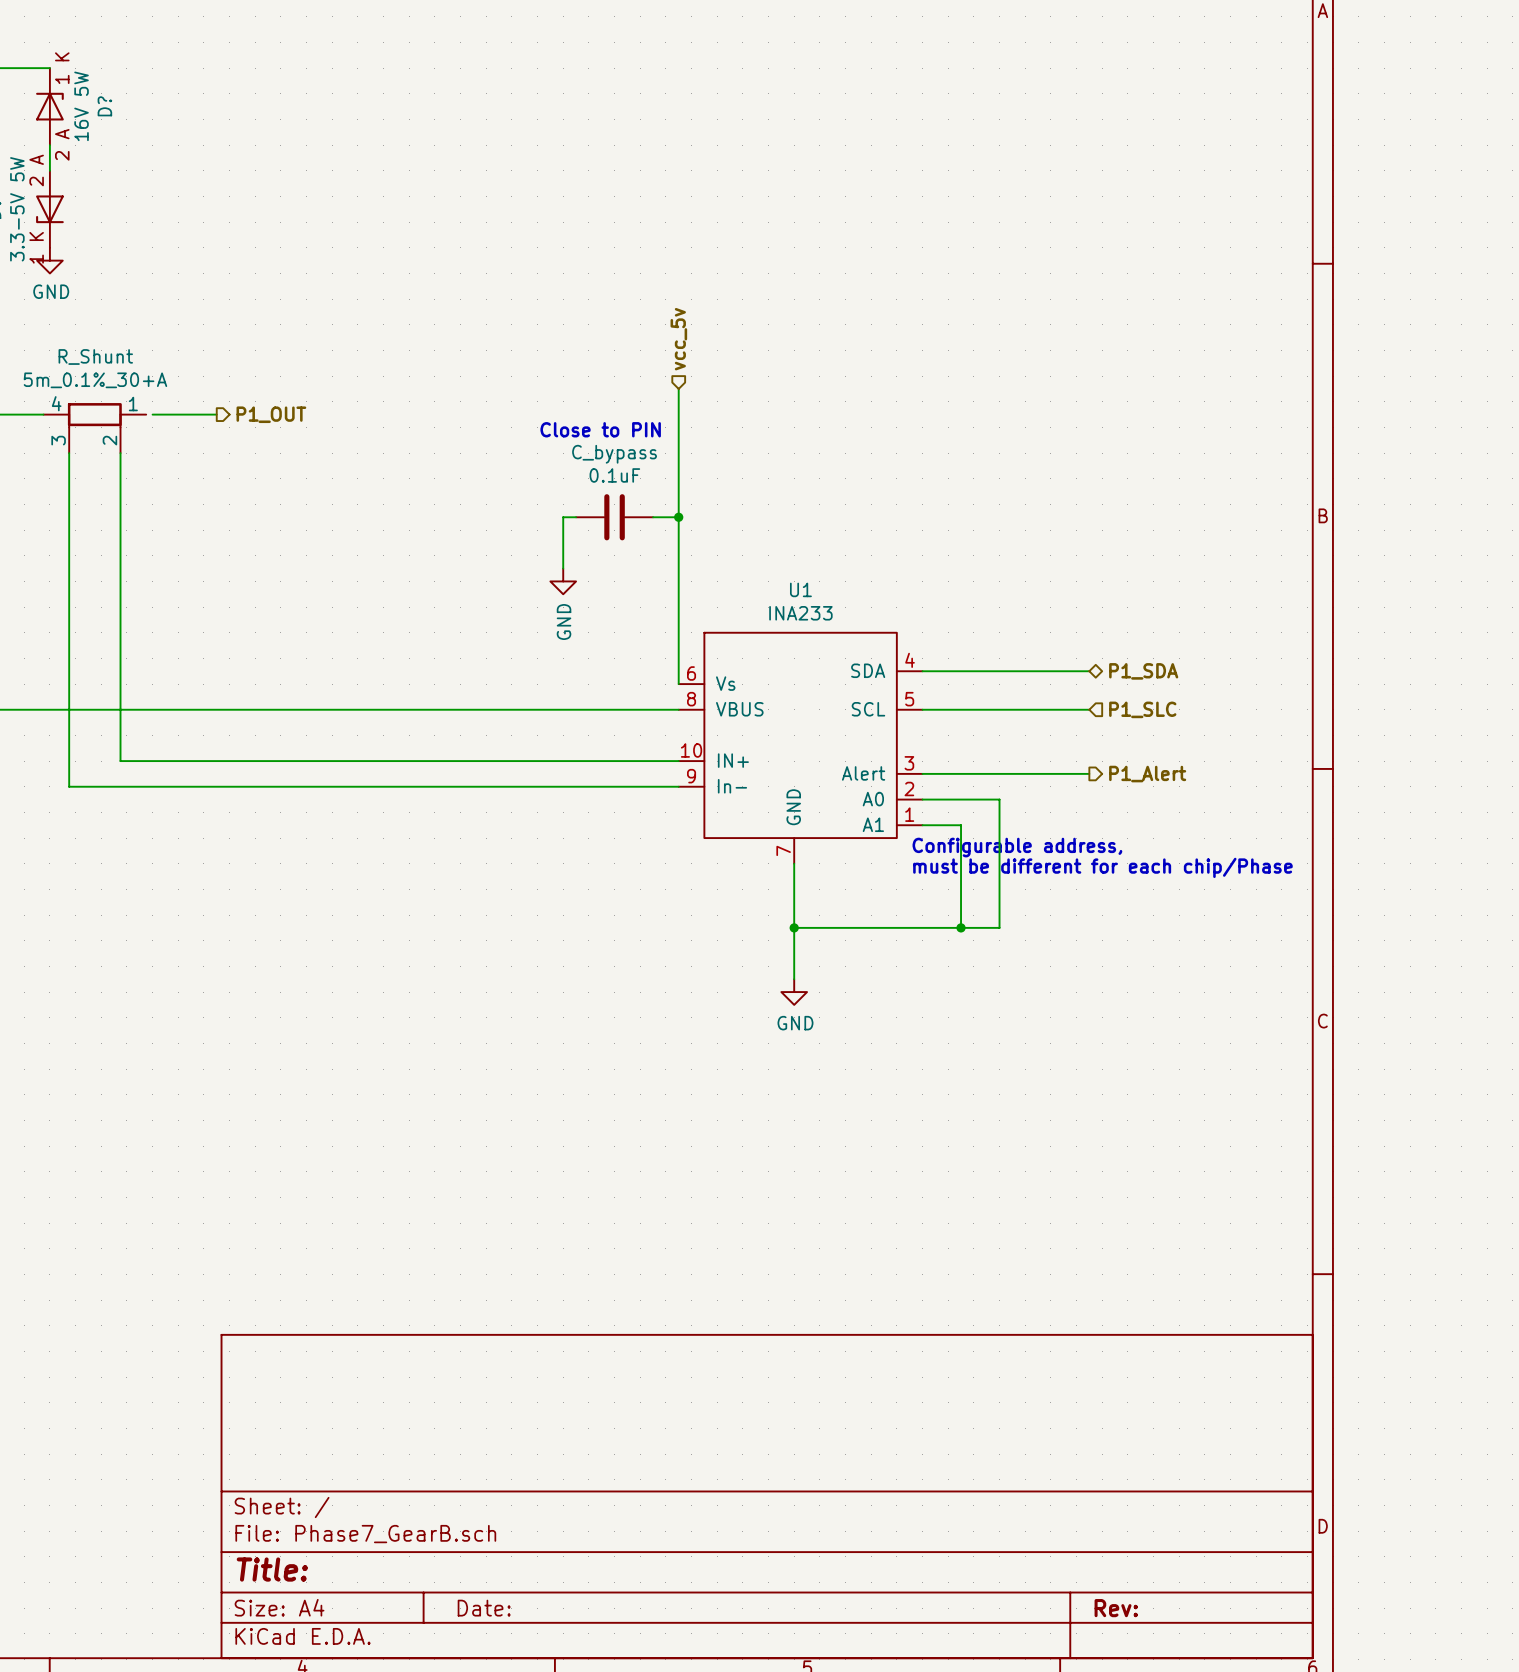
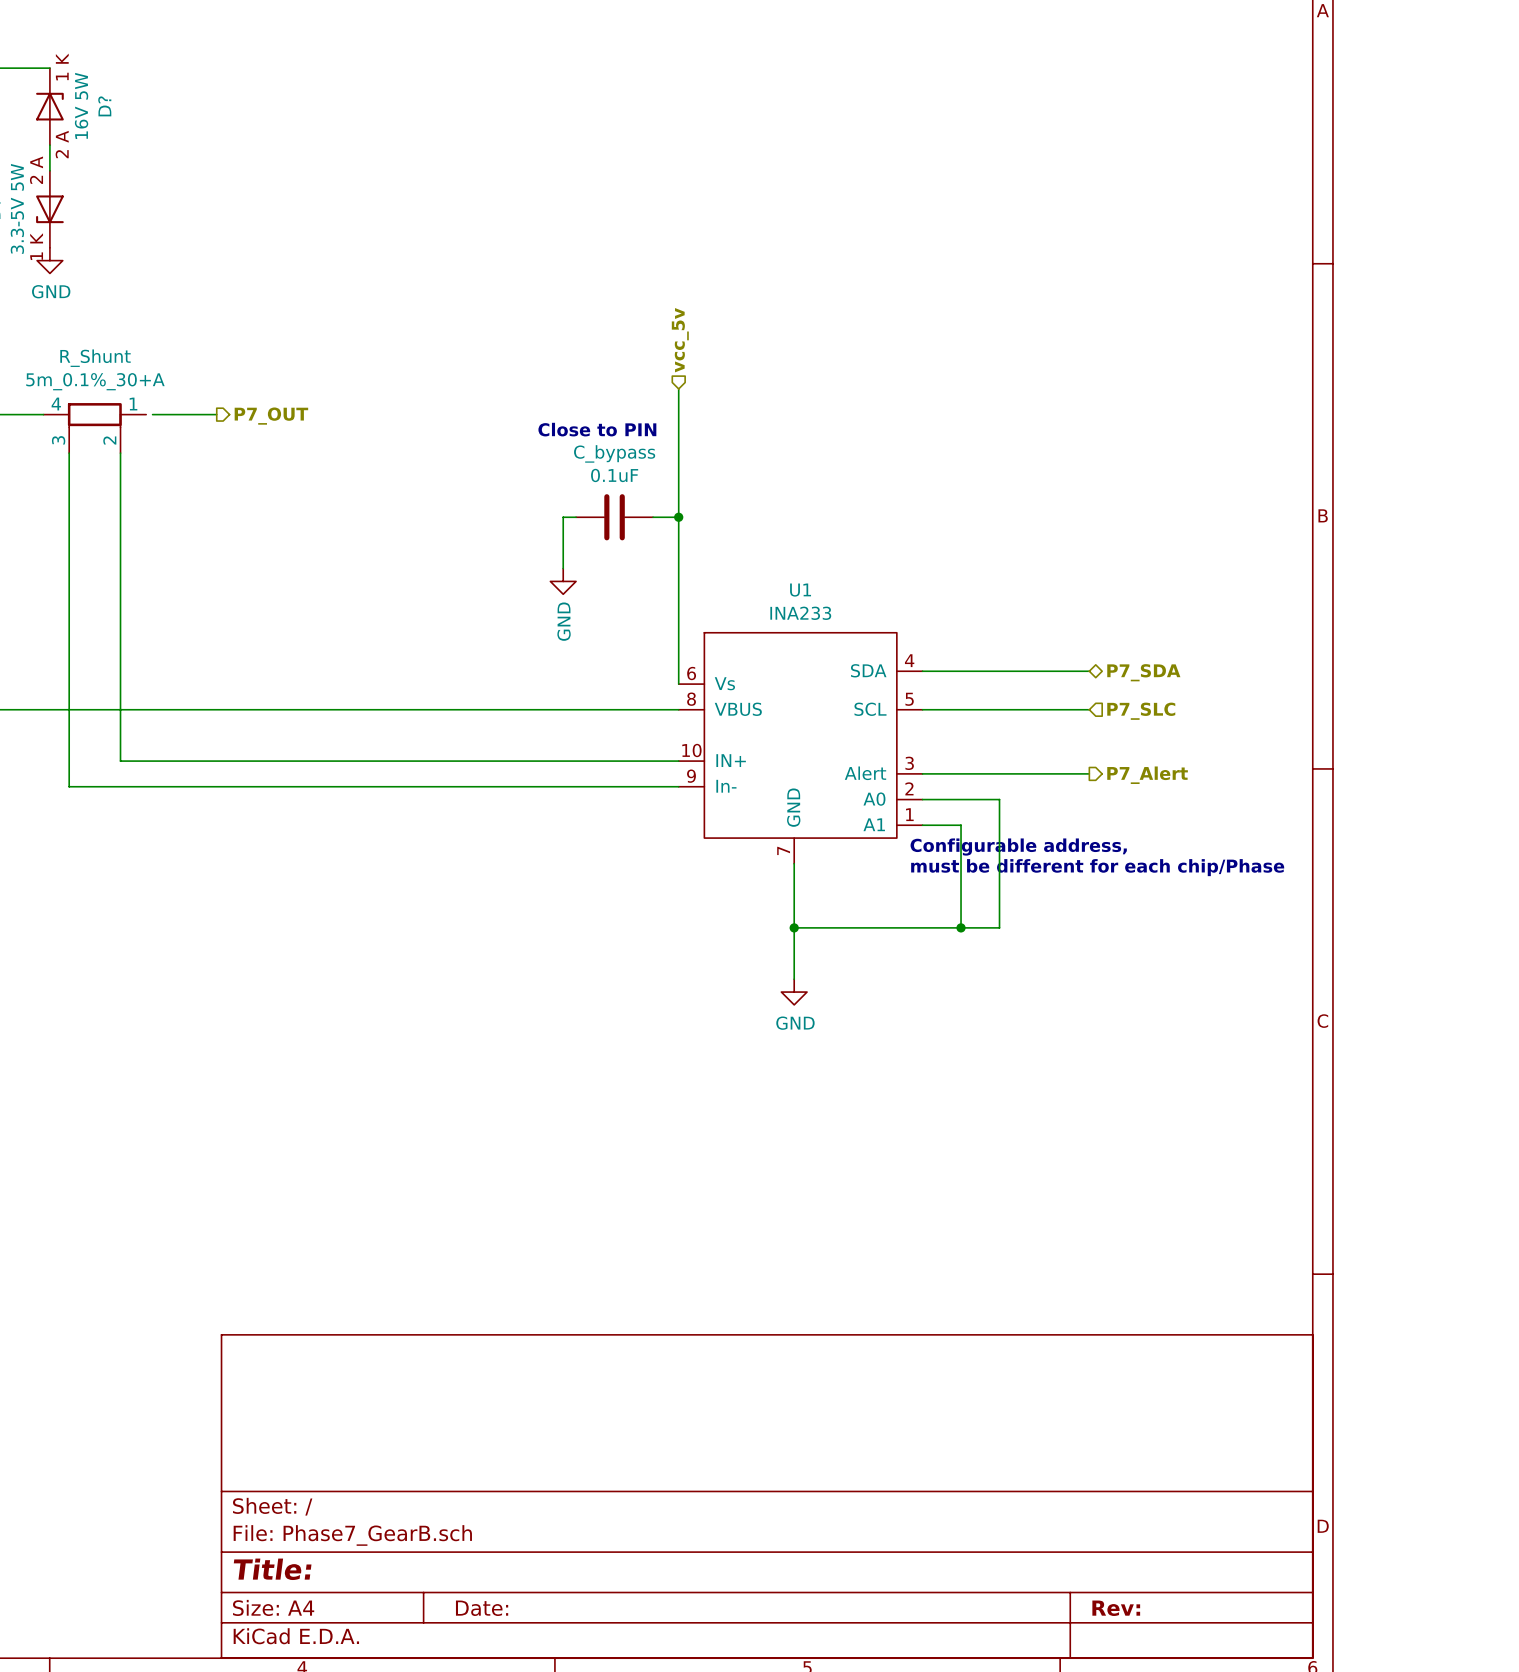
hierarchical label: P1_OUT (271, 414) -> P7_OUT (271, 416)
hierarchical label: P1_SDA (1143, 671) -> P7_SDA (1143, 672)
hierarchical label: P1_SLC (1142, 709) -> P7_SLC (1141, 711)
hierarchical label: P1_Alert (1147, 774) -> P7_Alert (1147, 775)

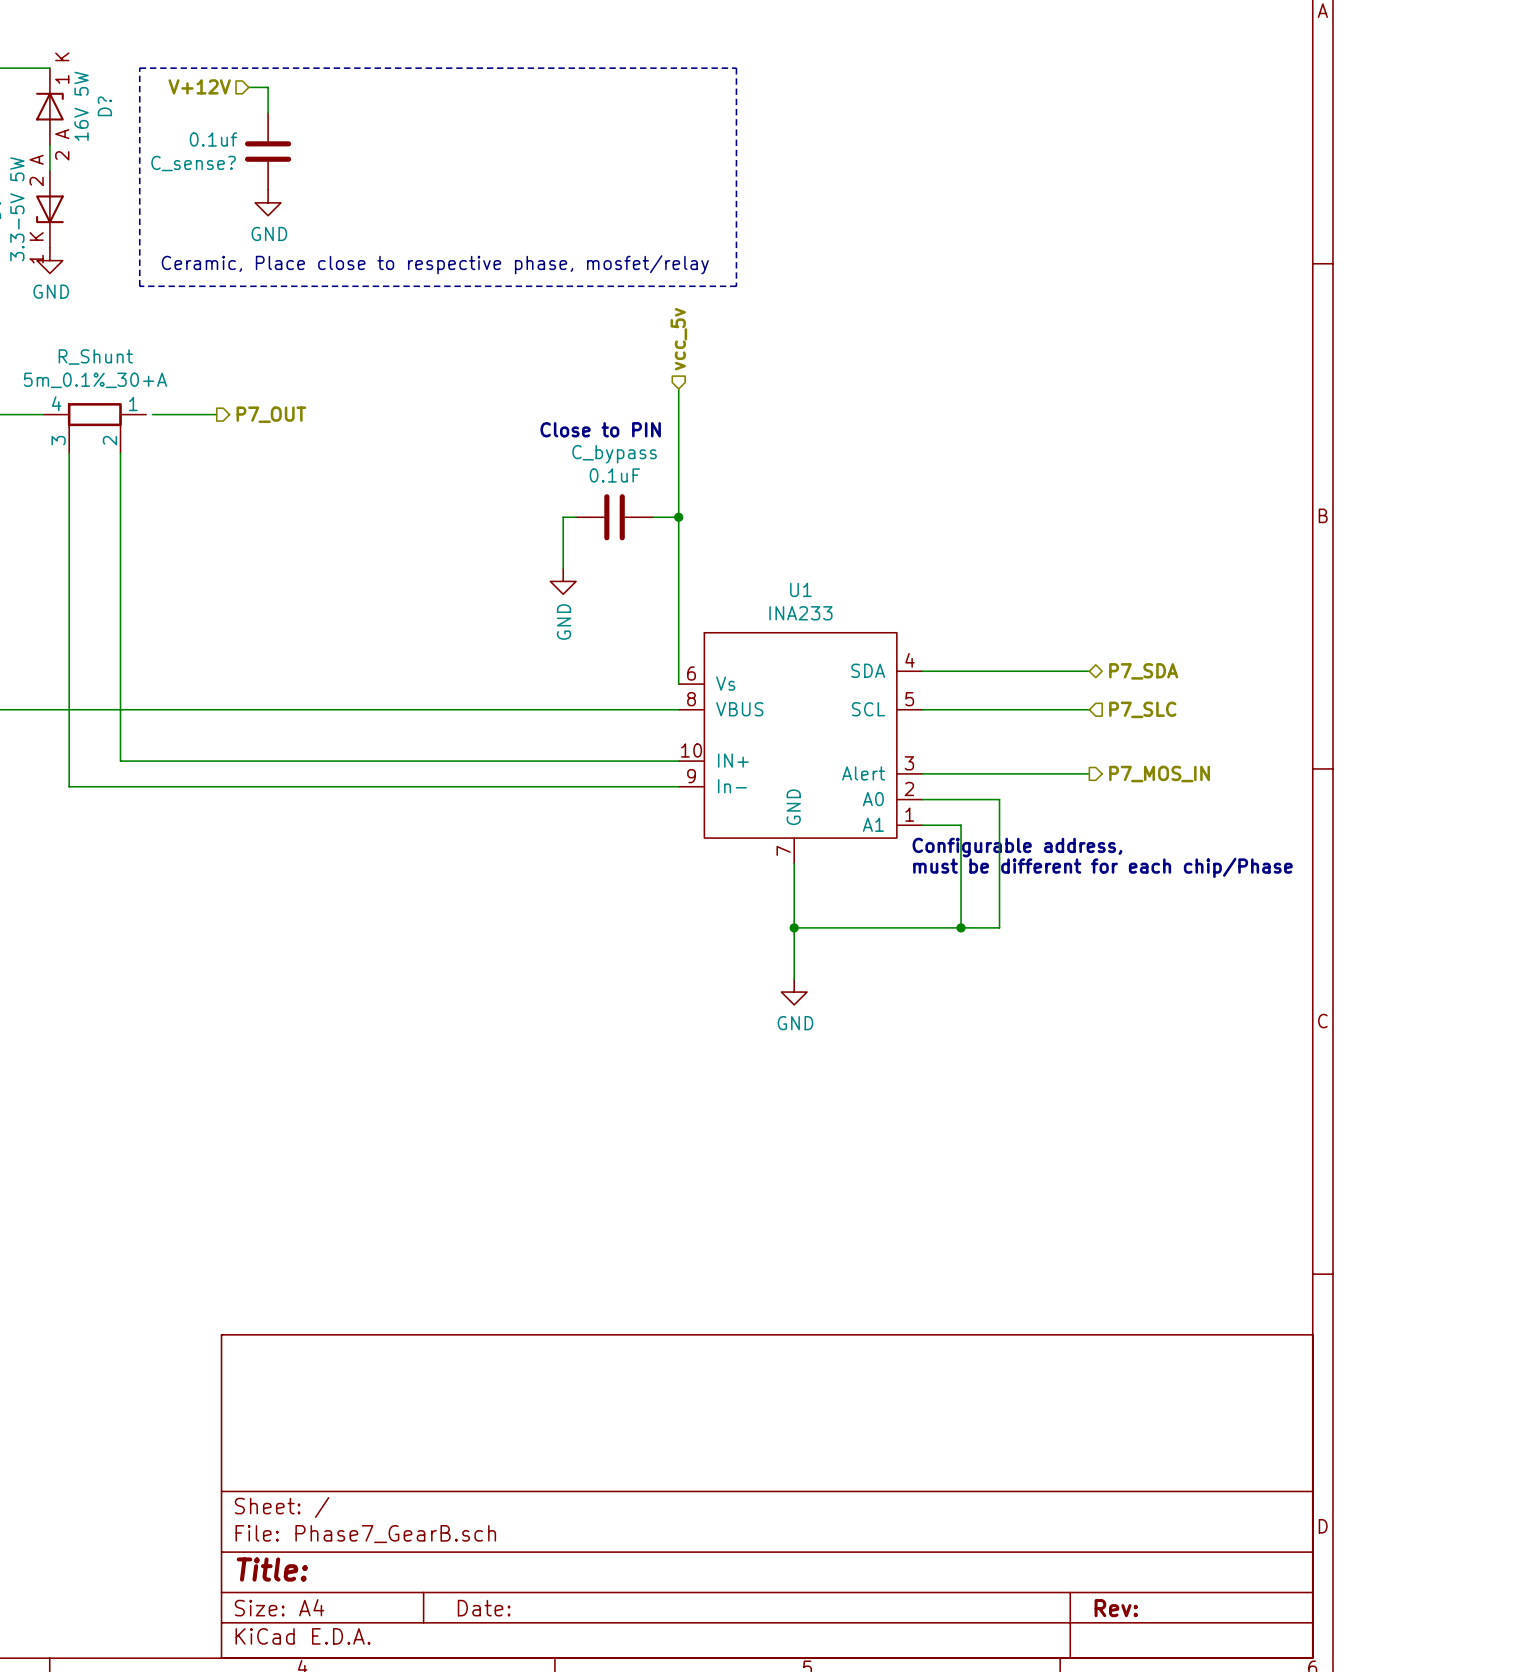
line: none -> (139, 68) (736, 68) (736, 286) (139, 286) (139, 68)
hierarchical label: none -> V+12V (199, 86)
wire: none -> (248, 87) (268, 87) (268, 113)
C_sense?: none -> 0.1uf (268, 151)
power symbol: none -> GND (268, 202)
text: none -> Ceramic, Place close to respective phase, mosfet/relay (435, 264)
hierarchical label: P7_Alert (1147, 775) -> P7_MOS_IN (1159, 774)

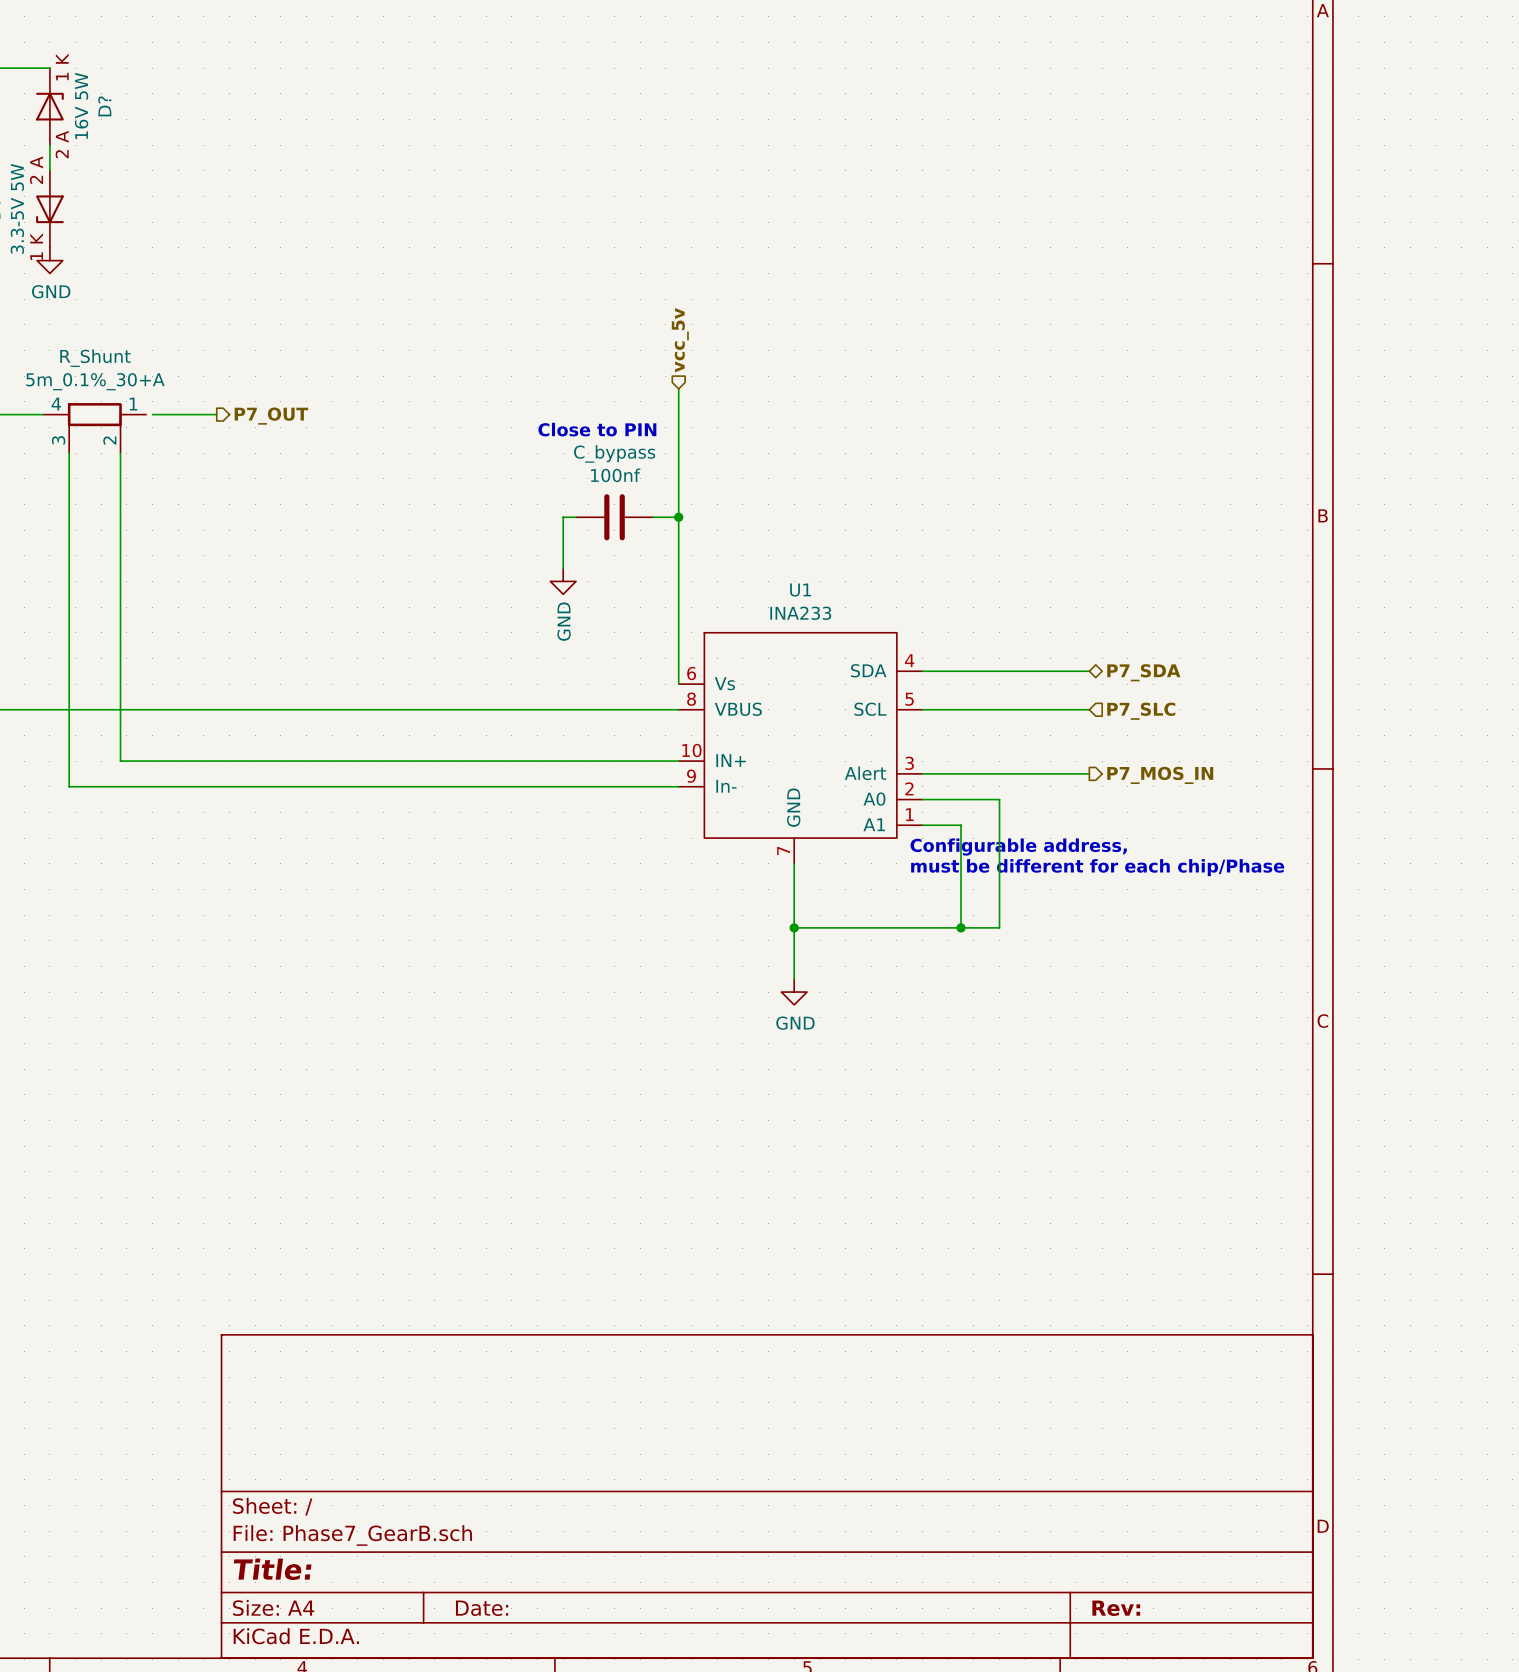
line: (139, 68) (736, 68) (736, 286) (139, 286) (139, 68) -> none
hierarchical label: V+12V (199, 86) -> none
wire: (248, 87) (268, 87) (268, 113) -> none
C_sense?: 0.1uf (268, 151) -> none
power symbol: GND (268, 202) -> none
text: Ceramic, Place close to respective phase, mosfet/relay (435, 264) -> none
C_bypass value: 0.1uF (614, 475) -> 100nf (615, 475)

